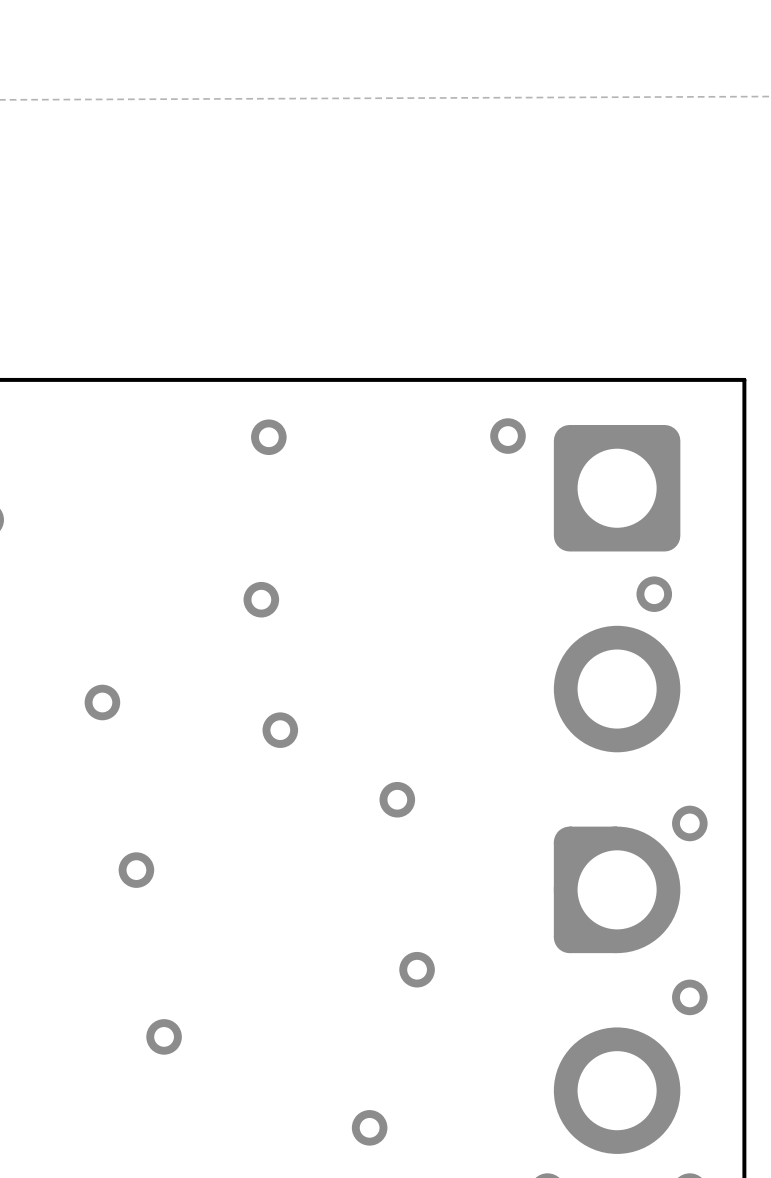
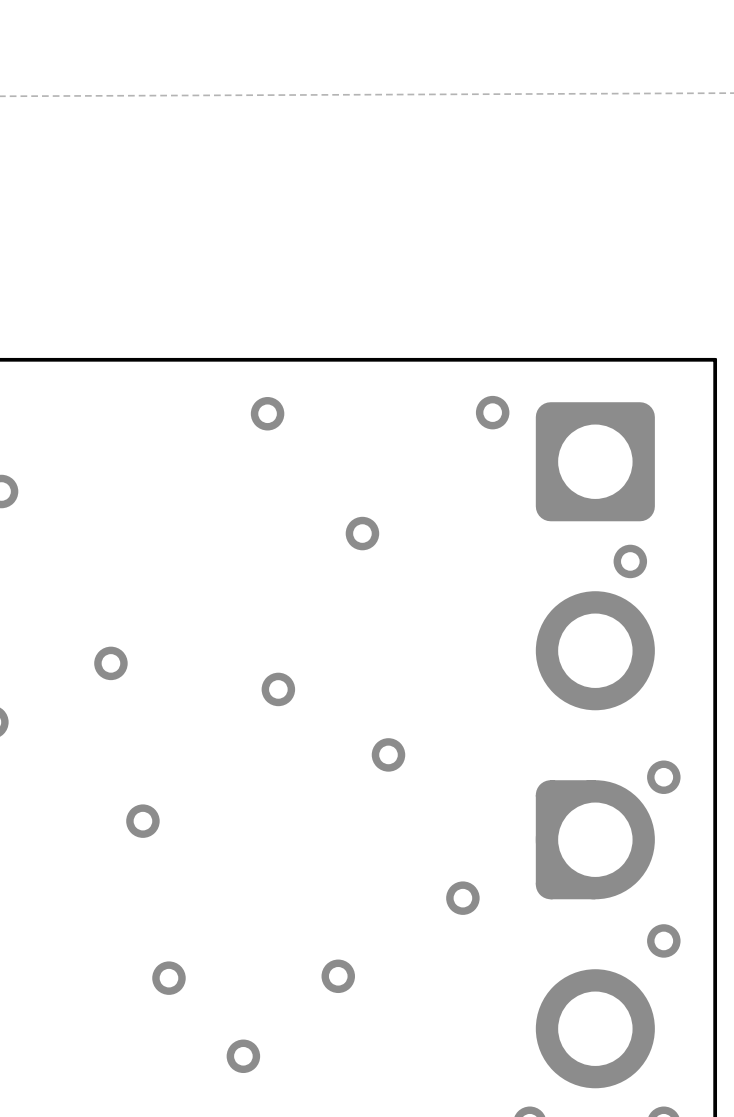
via position: (261, 599) -> (362, 533)
via: none -> (462, 898)
via: (417, 969) -> none
via: none -> (338, 976)
via: none -> (243, 1056)
via: (369, 1127) -> none

